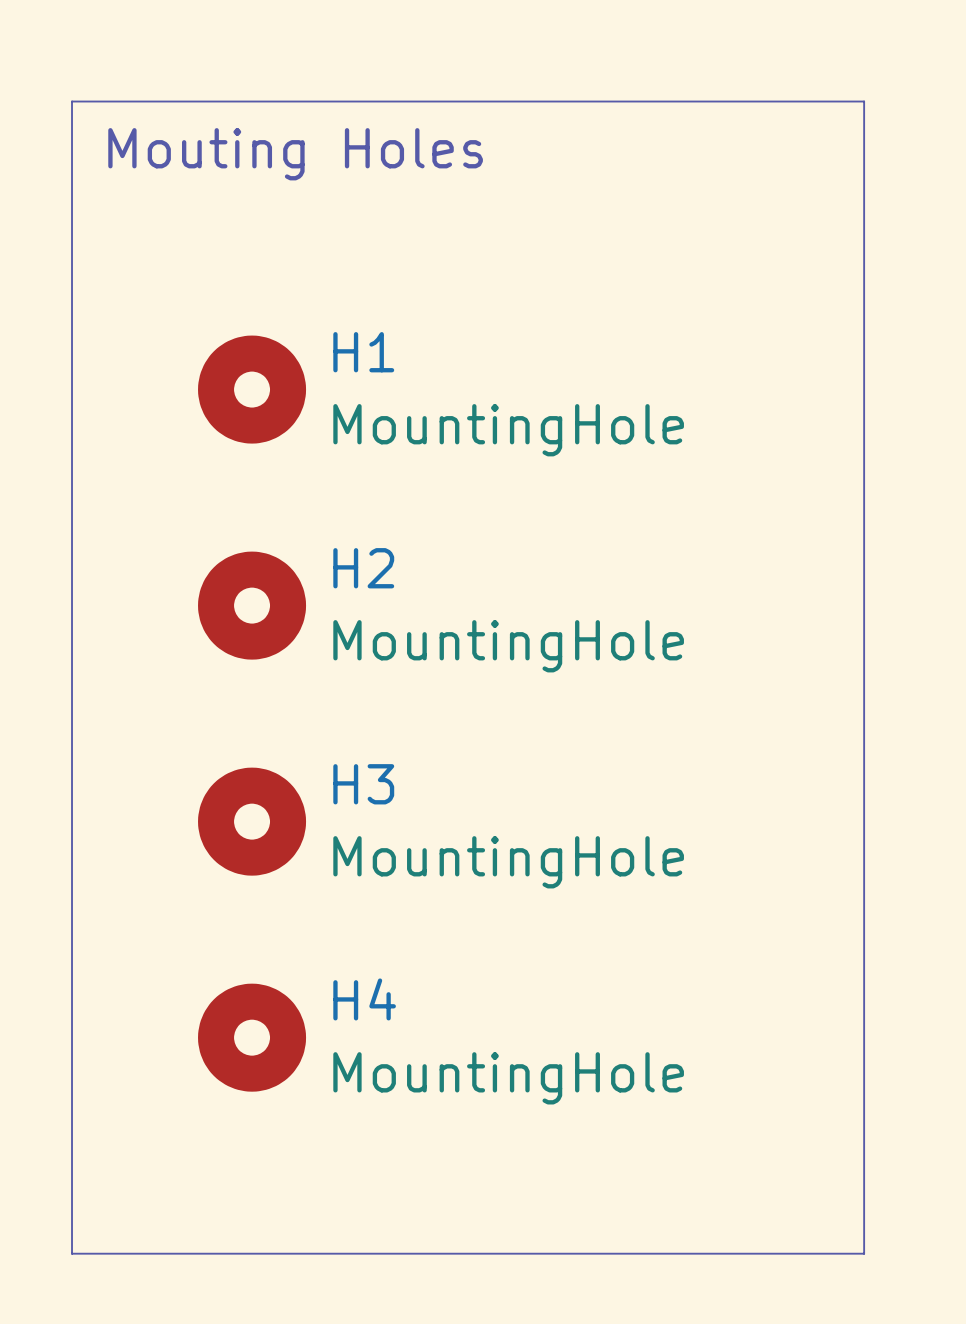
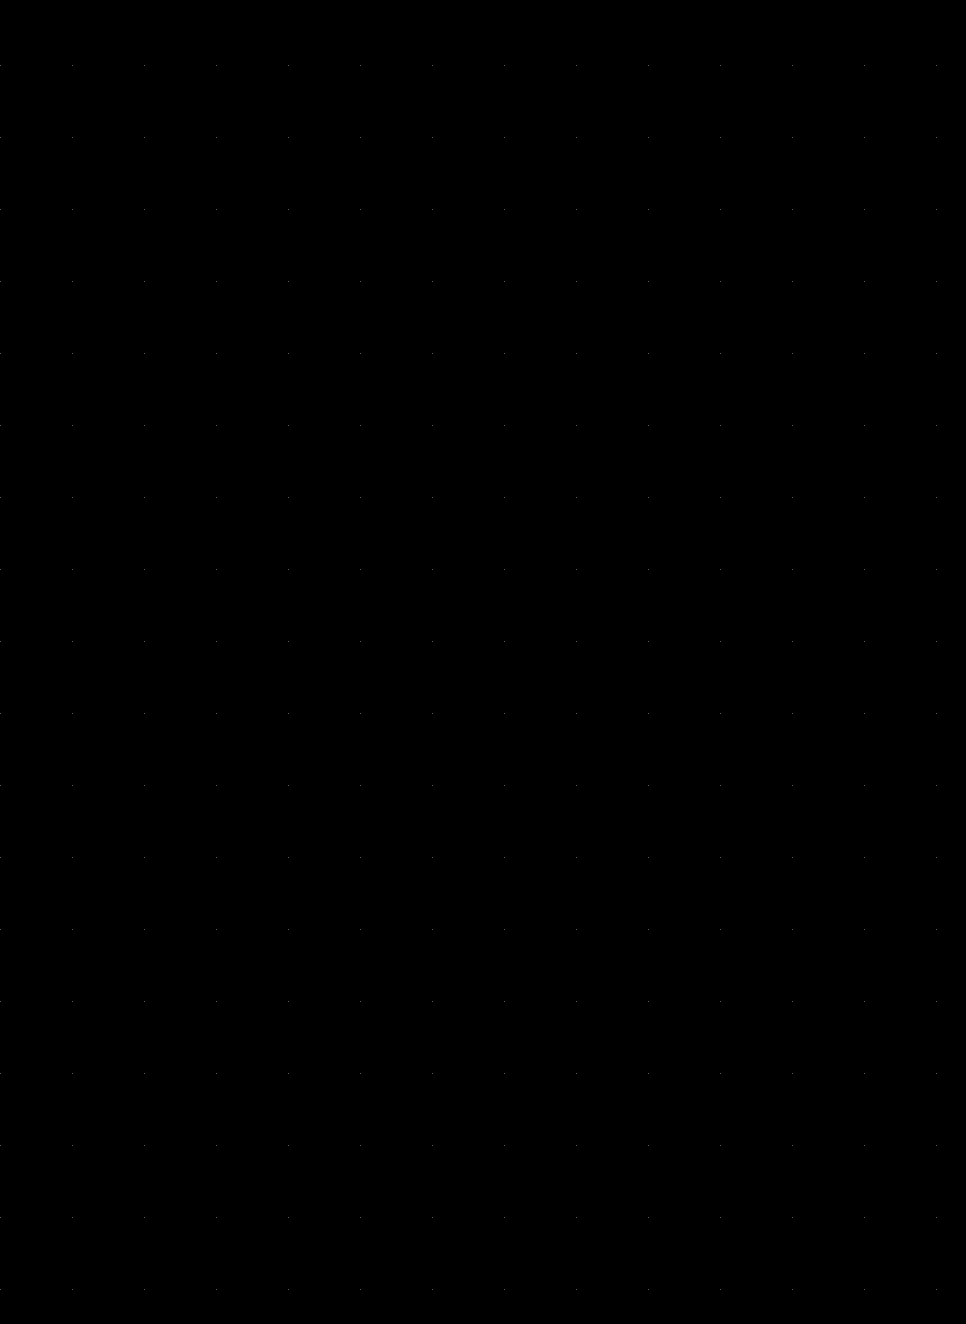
line: (72, 101) (864, 101) (864, 1253) (72, 1253) (72, 101) -> none
text: Mouting Holes (295, 154) -> none
H1: MountingHole (252, 389) -> none
H2: MountingHole (252, 605) -> none
H3: MountingHole (252, 821) -> none
H4: MountingHole (252, 1037) -> none

